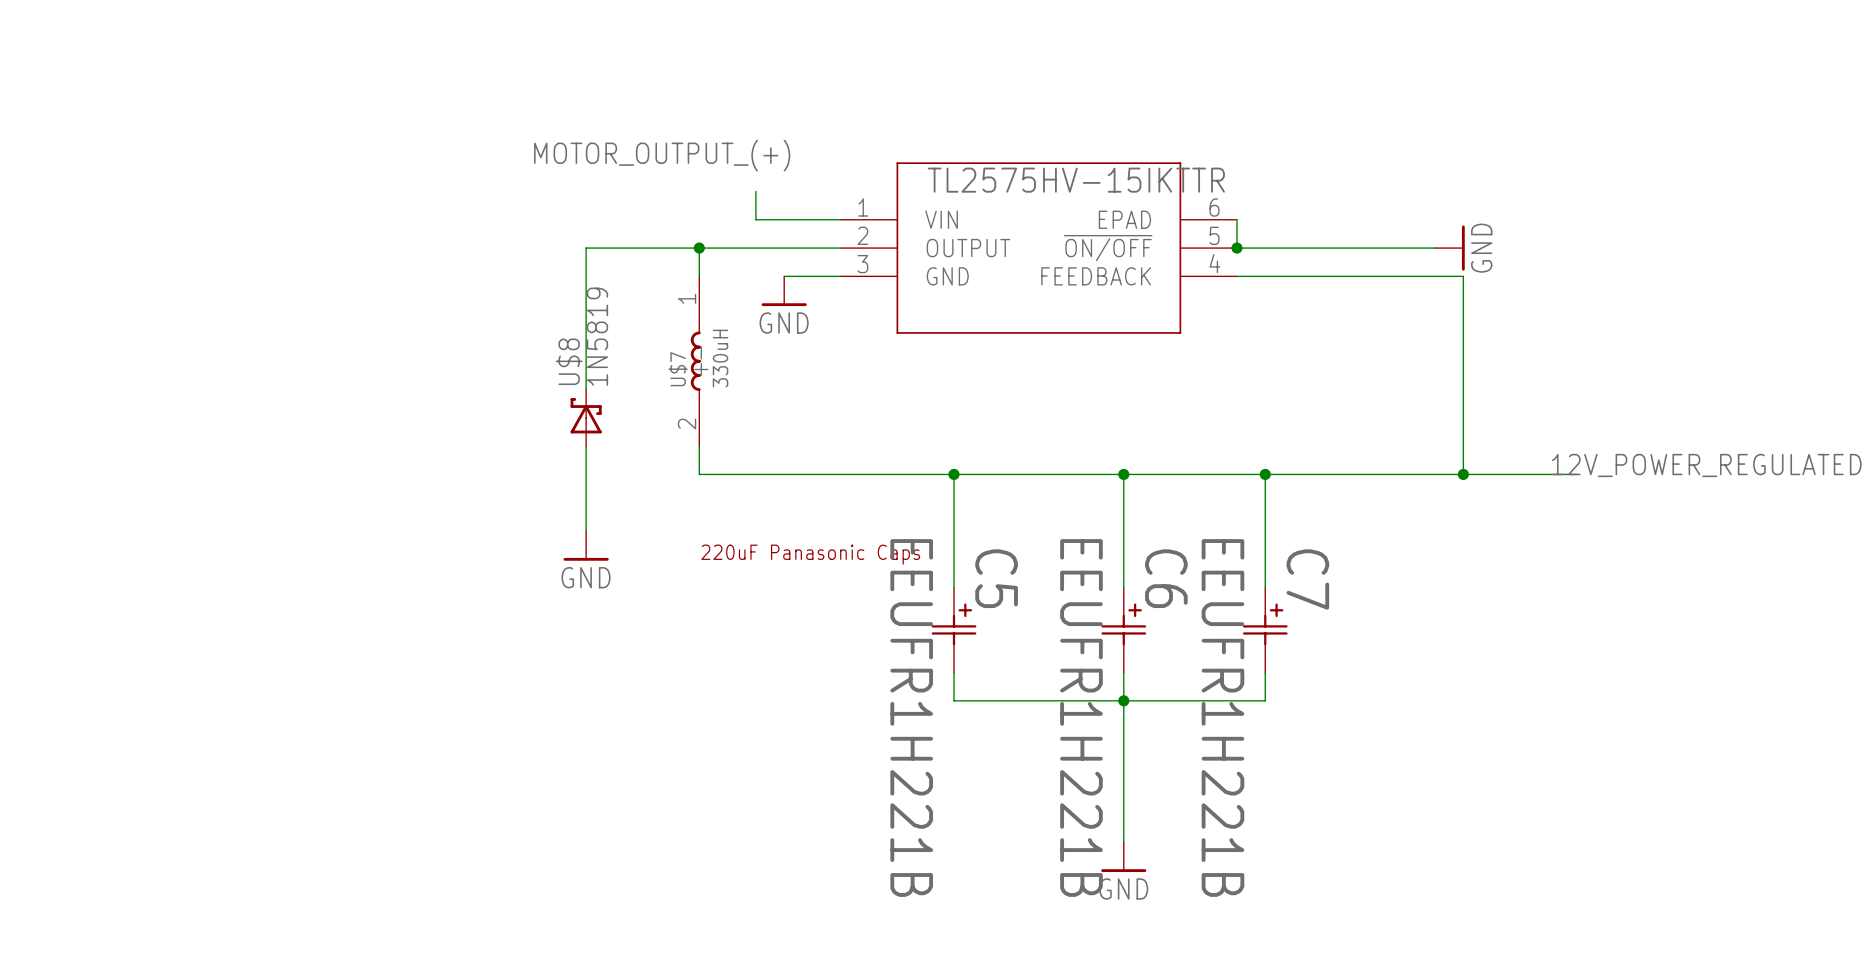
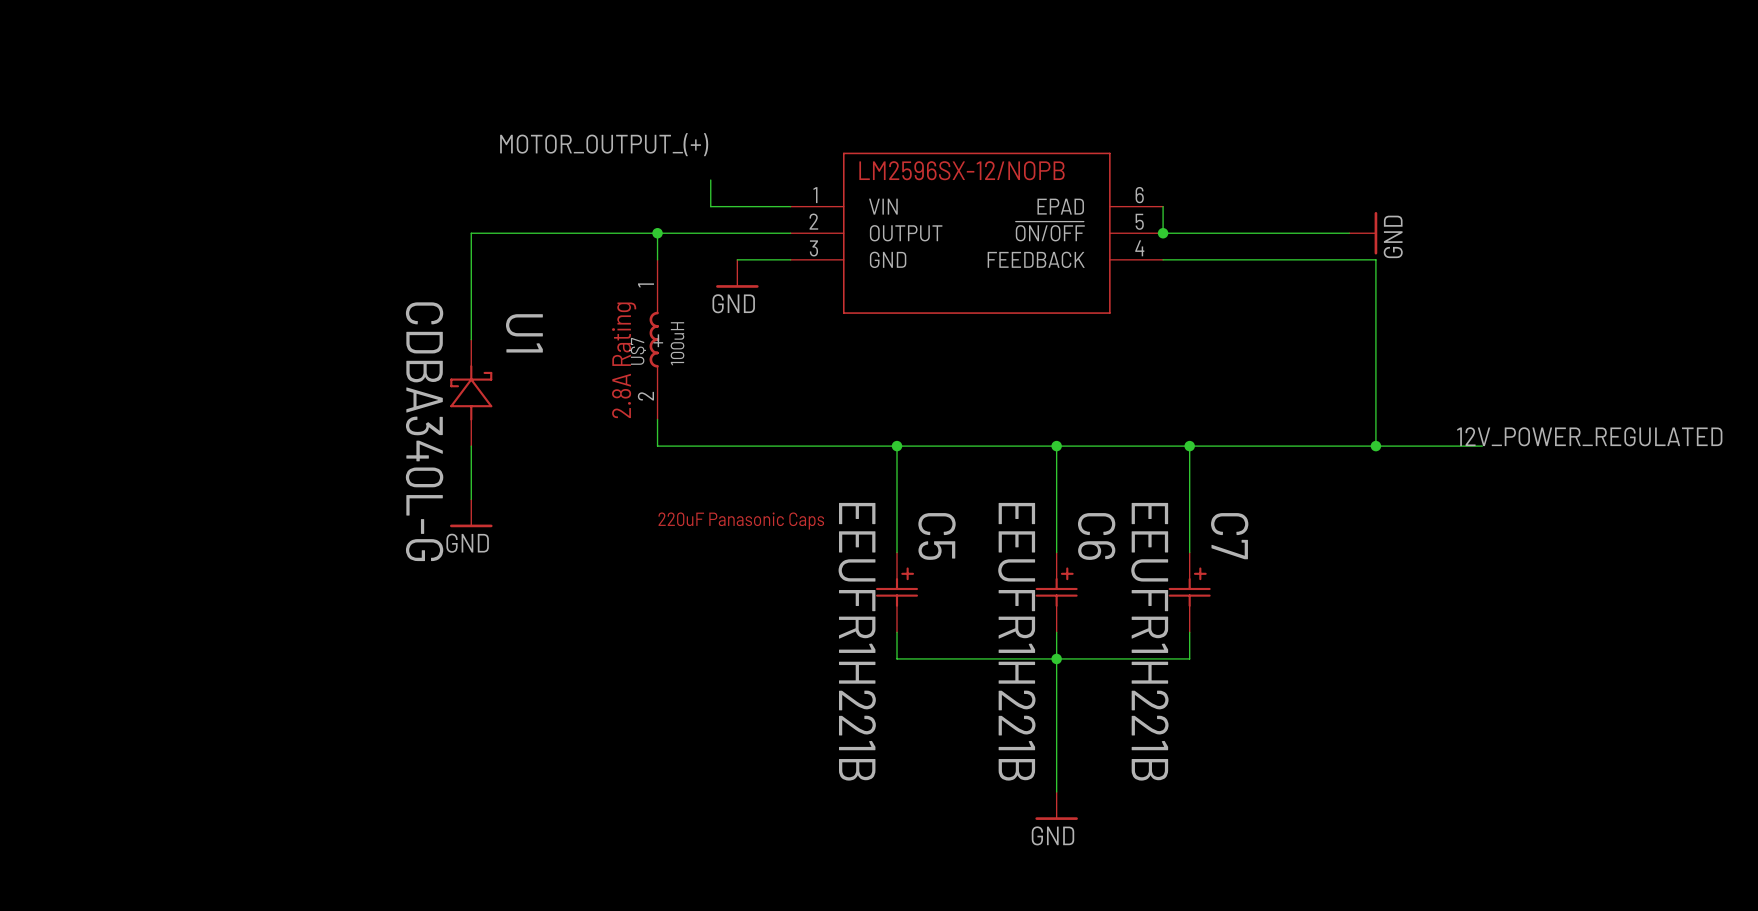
part value: TL2575HV-15IKTTR (1076, 180) -> none
part text: none -> LM2596SX-12/NOPB (961, 170)
wire: (586, 248) (586, 389) -> (551, 233) (471, 233) (471, 339)
U$7 value: 330uH (720, 358) -> 100uH (677, 343)
text: none -> 2.8A Rating (624, 360)
U1: none -> CDBA340L-G (471, 392)
U$8: 1N5819 (586, 417) -> none
wire: (586, 446) (586, 531) -> none
wire: none -> (471, 446) (471, 499)
power symbol position: GND (586, 545) -> GND (471, 513)

